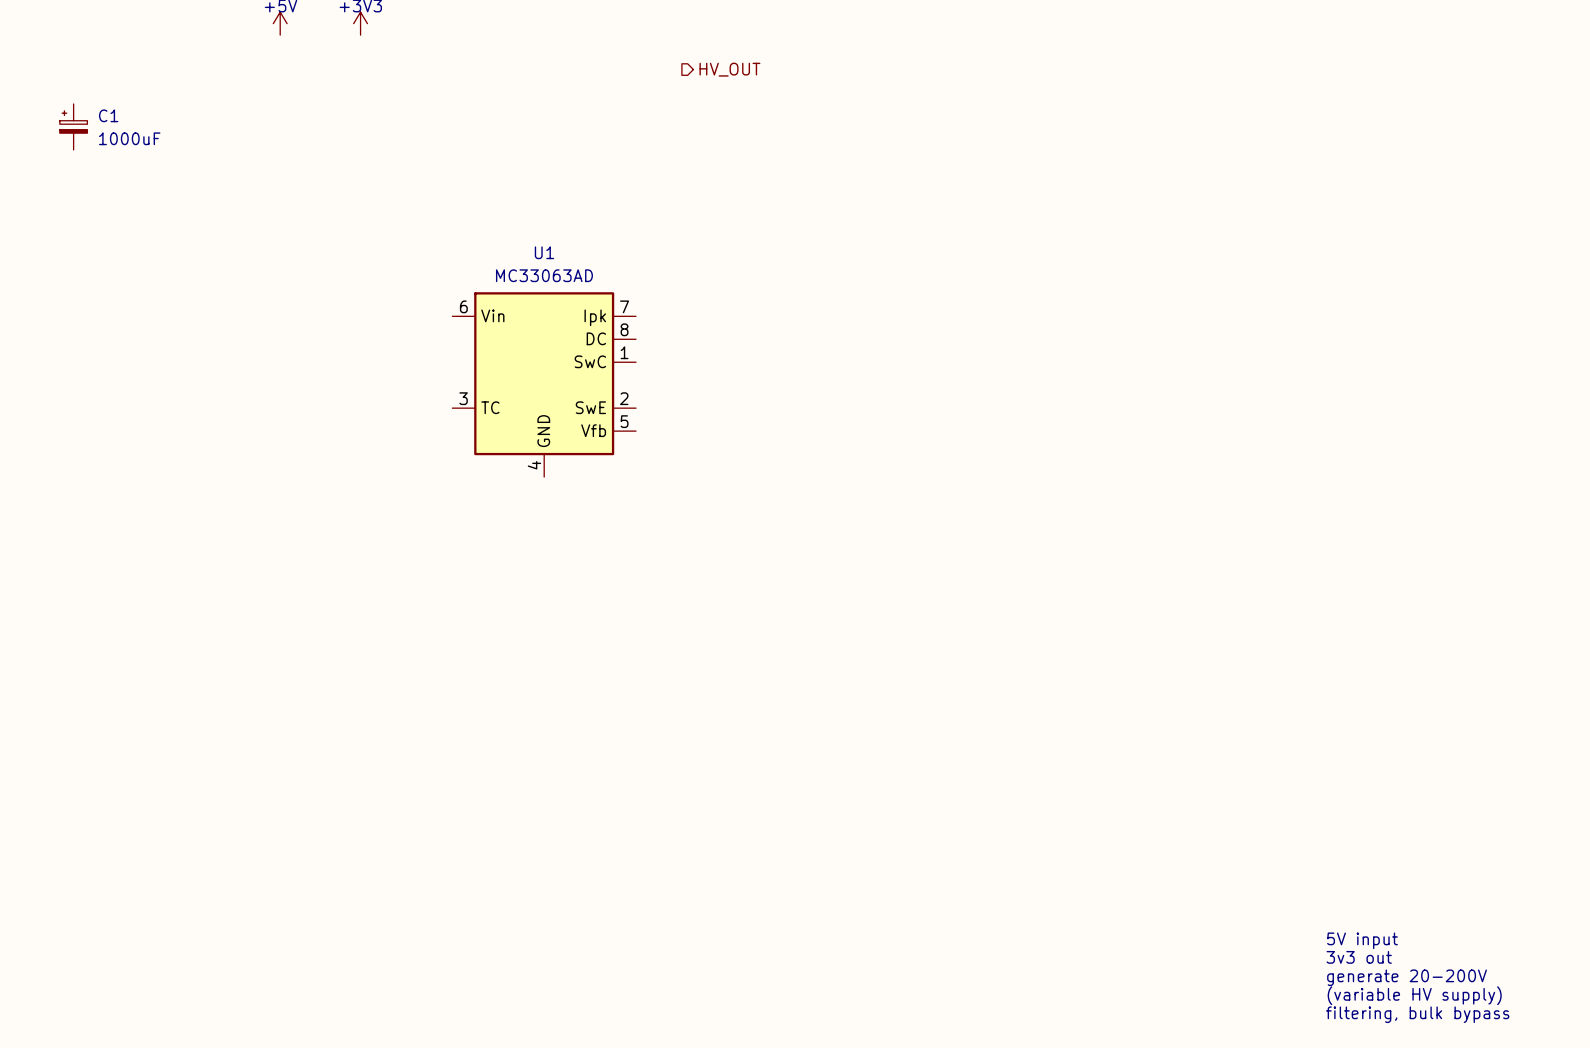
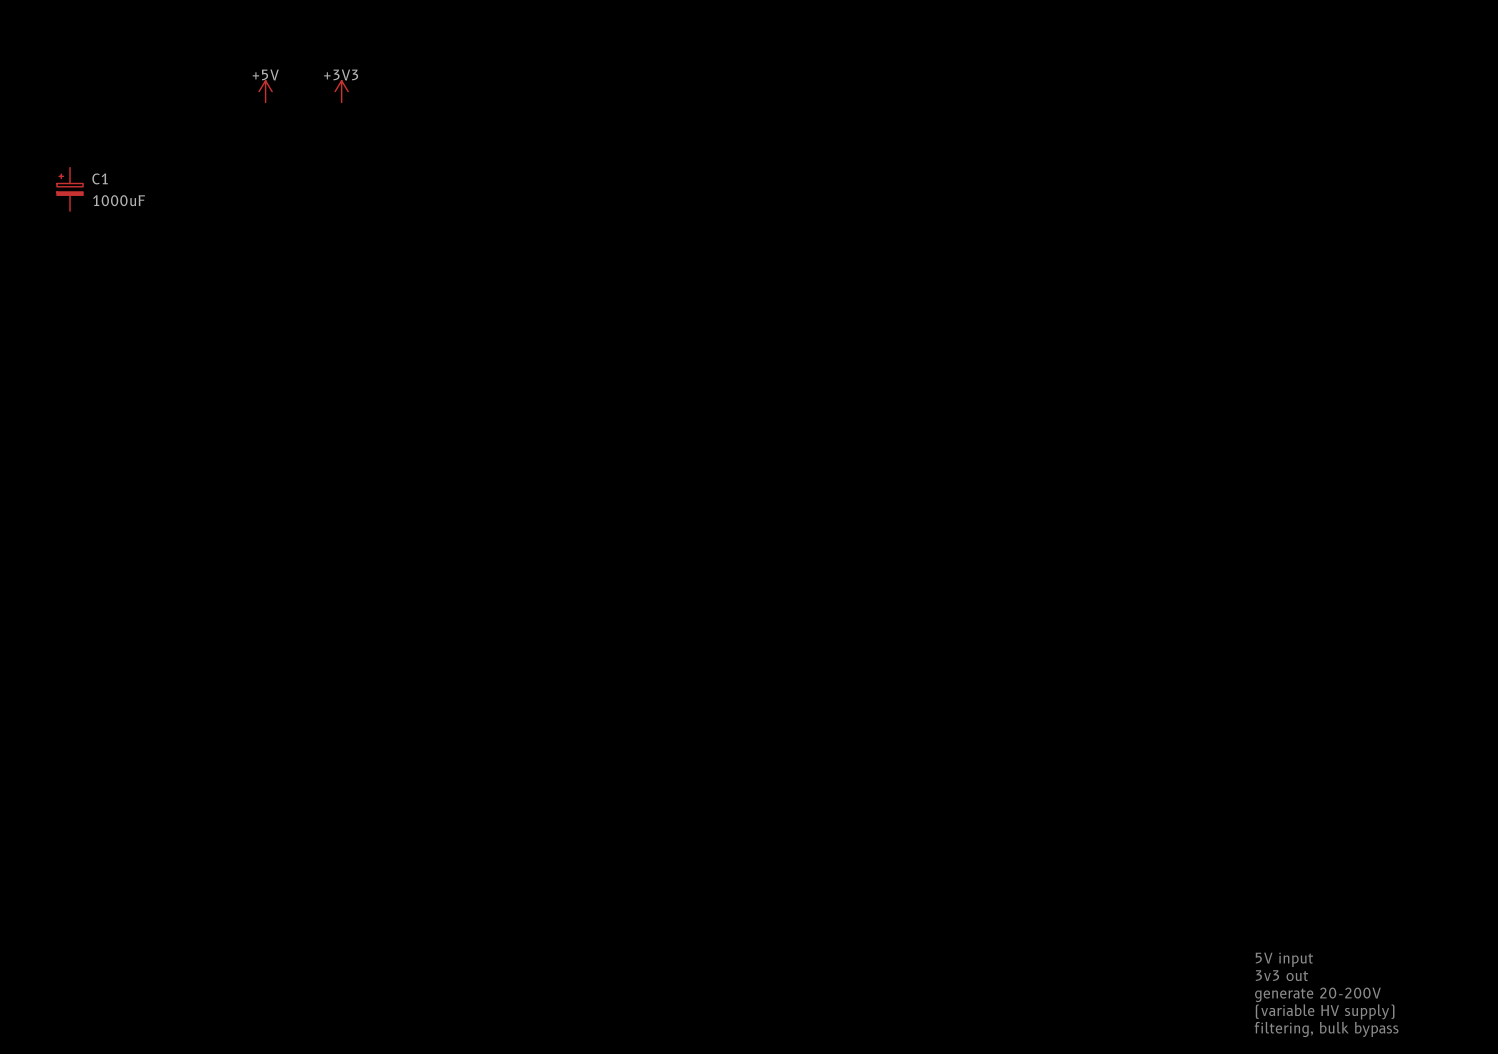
hierarchical label: HV_OUT (729, 69) -> none
U1: MC33063AD (544, 384) -> none

